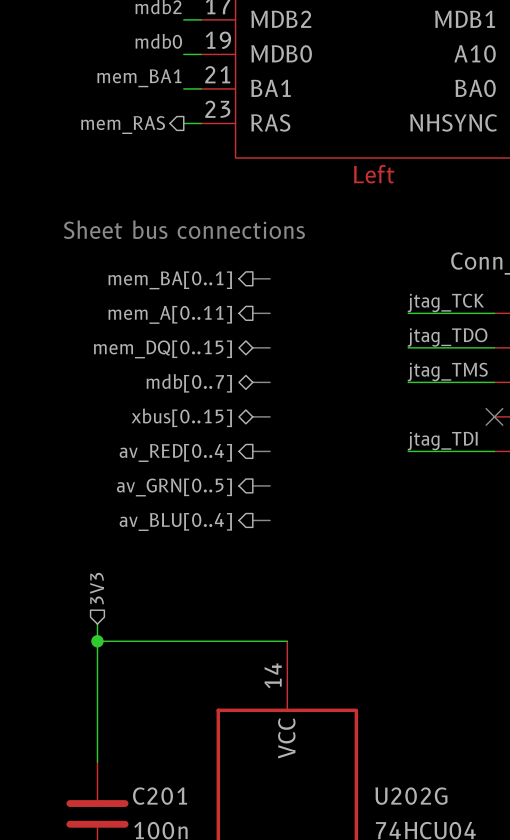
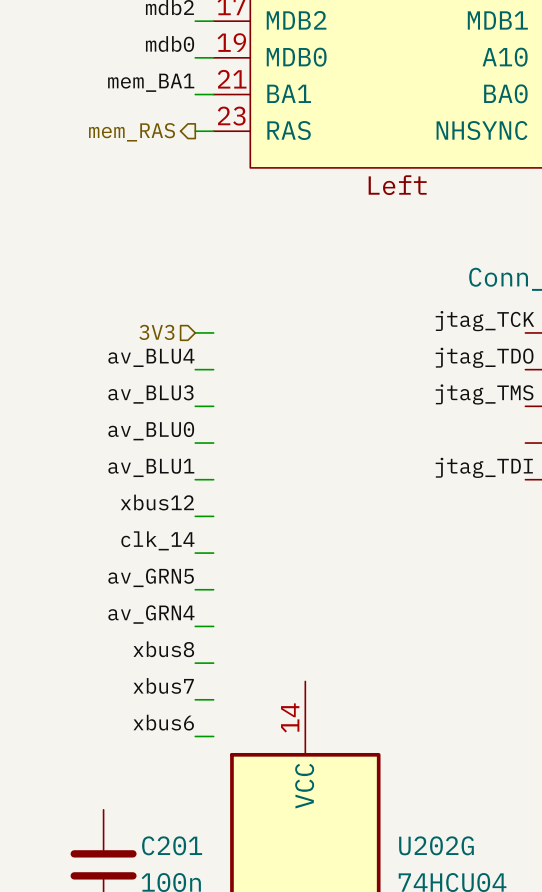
text: Sheet bus connections (184, 229) -> none
bus: (252, 278) (270, 278) -> none
hierarchical label: mem_BA[0..1] (170, 280) -> none
hierarchical label: none -> 3V3 (156, 332)
wire: none -> (195, 332) (213, 332)
bus: (252, 313) (270, 313) -> none
wire: (408, 313) (494, 313) -> none
hierarchical label: mem_A[0..11] (170, 314) -> none
label: none -> av_BLU4 (151, 357)
wire: none -> (195, 369) (213, 369)
bus: (252, 347) (270, 347) -> none
wire: (408, 347) (494, 347) -> none
hierarchical label: mem_DQ[0..15] (163, 349) -> none
label: none -> av_BLU3 (150, 394)
wire: none -> (195, 406) (213, 406)
bus: (252, 382) (270, 382) -> none
wire: (408, 382) (494, 382) -> none
hierarchical label: mdb[0..7] (189, 383) -> none
label: none -> av_BLU0 (151, 431)
wire: none -> (195, 443) (213, 443)
bus: (252, 416) (270, 416) -> none
no-connect mark: (494, 416) -> none
hierarchical label: xbus[0..15] (181, 417) -> none
label: none -> av_BLU1 (151, 467)
wire: none -> (195, 479) (213, 479)
bus: (252, 451) (270, 451) -> none
wire: (408, 451) (494, 451) -> none
hierarchical label: av_RED[0..4] (175, 452) -> none
label: none -> xbus12 (157, 502)
wire: none -> (195, 516) (213, 516)
bus: (252, 485) (270, 485) -> none
hierarchical label: av_GRN[0..5] (174, 487) -> none
label: none -> clk_14 (157, 540)
wire: none -> (195, 553) (213, 553)
bus: (252, 520) (270, 520) -> none
hierarchical label: av_BLU[0..4] (175, 522) -> none
label: none -> av_GRN5 (151, 577)
wire: none -> (195, 589) (213, 589)
label: none -> av_GRN4 (151, 614)
hierarchical label: 3V3 (97, 588) -> none
wire: none -> (195, 626) (213, 626)
label: none -> xbus8 (163, 649)
wire: (97, 624) (97, 762) -> none
wire: none -> (195, 663) (213, 663)
wire: (97, 641) (287, 641) -> none
junction: (97, 641) -> none
label: none -> xbus7 (163, 685)
wire: none -> (195, 699) (213, 699)
label: none -> xbus6 (163, 722)
wire: none -> (195, 736) (213, 736)

